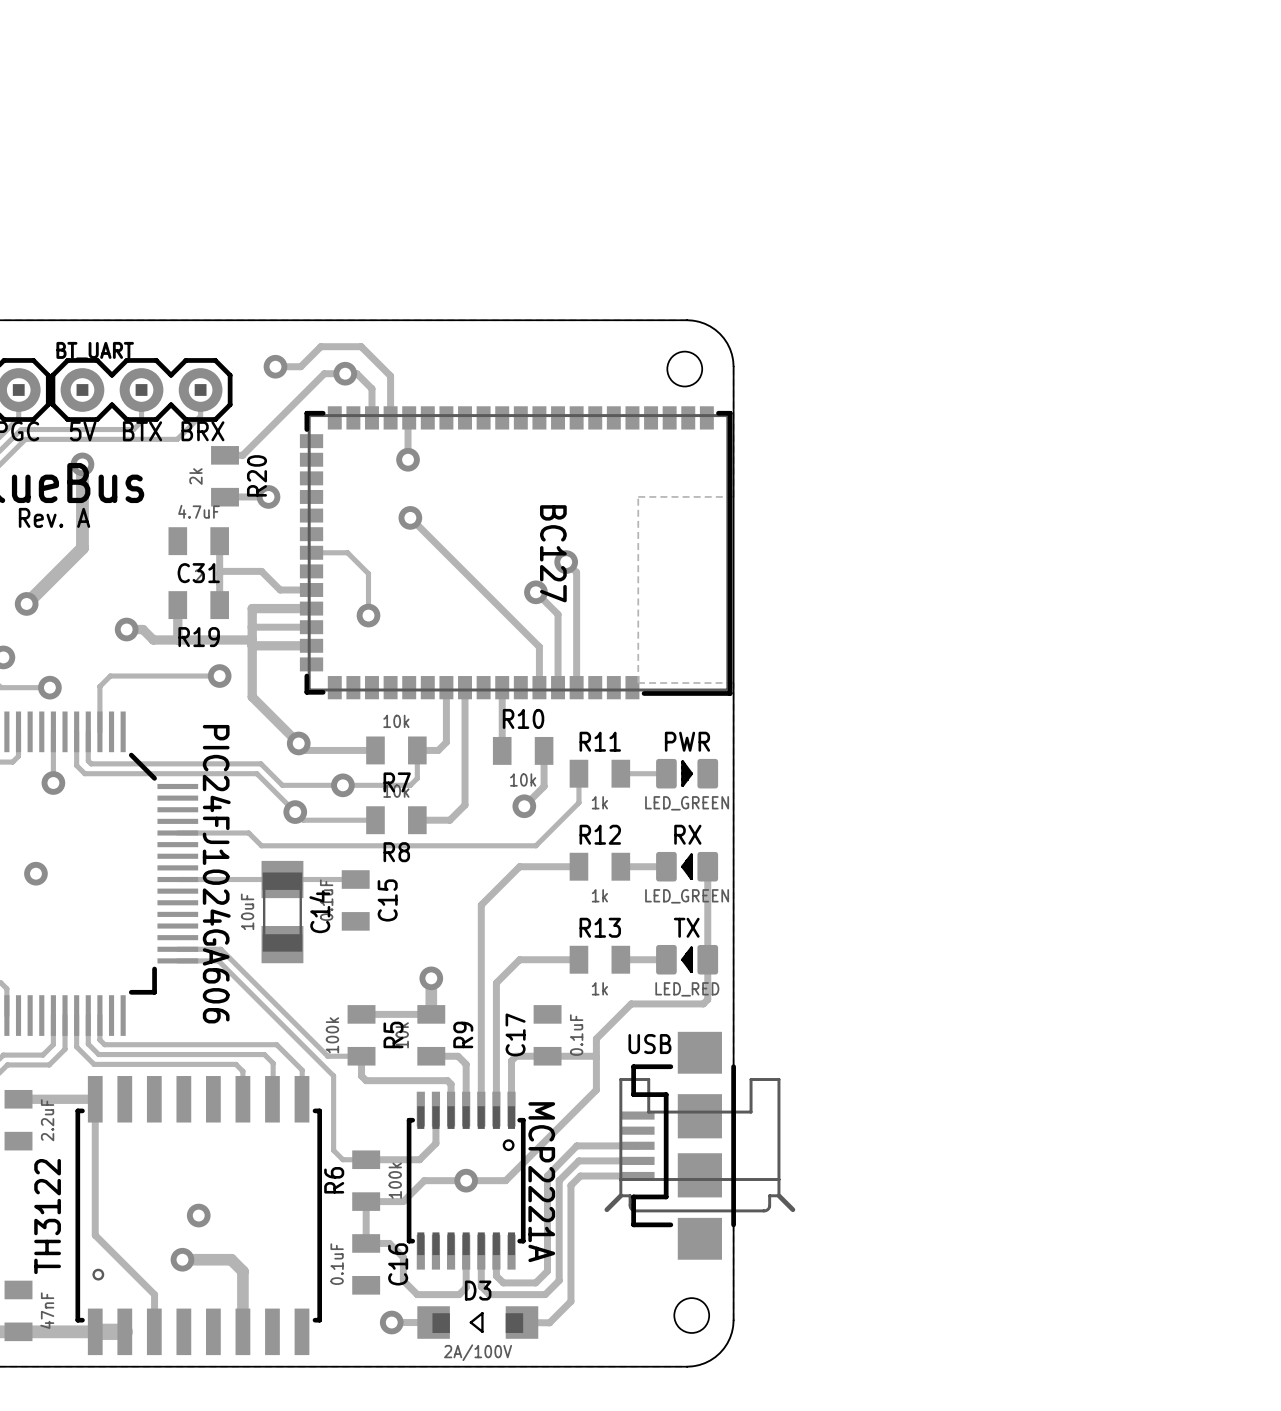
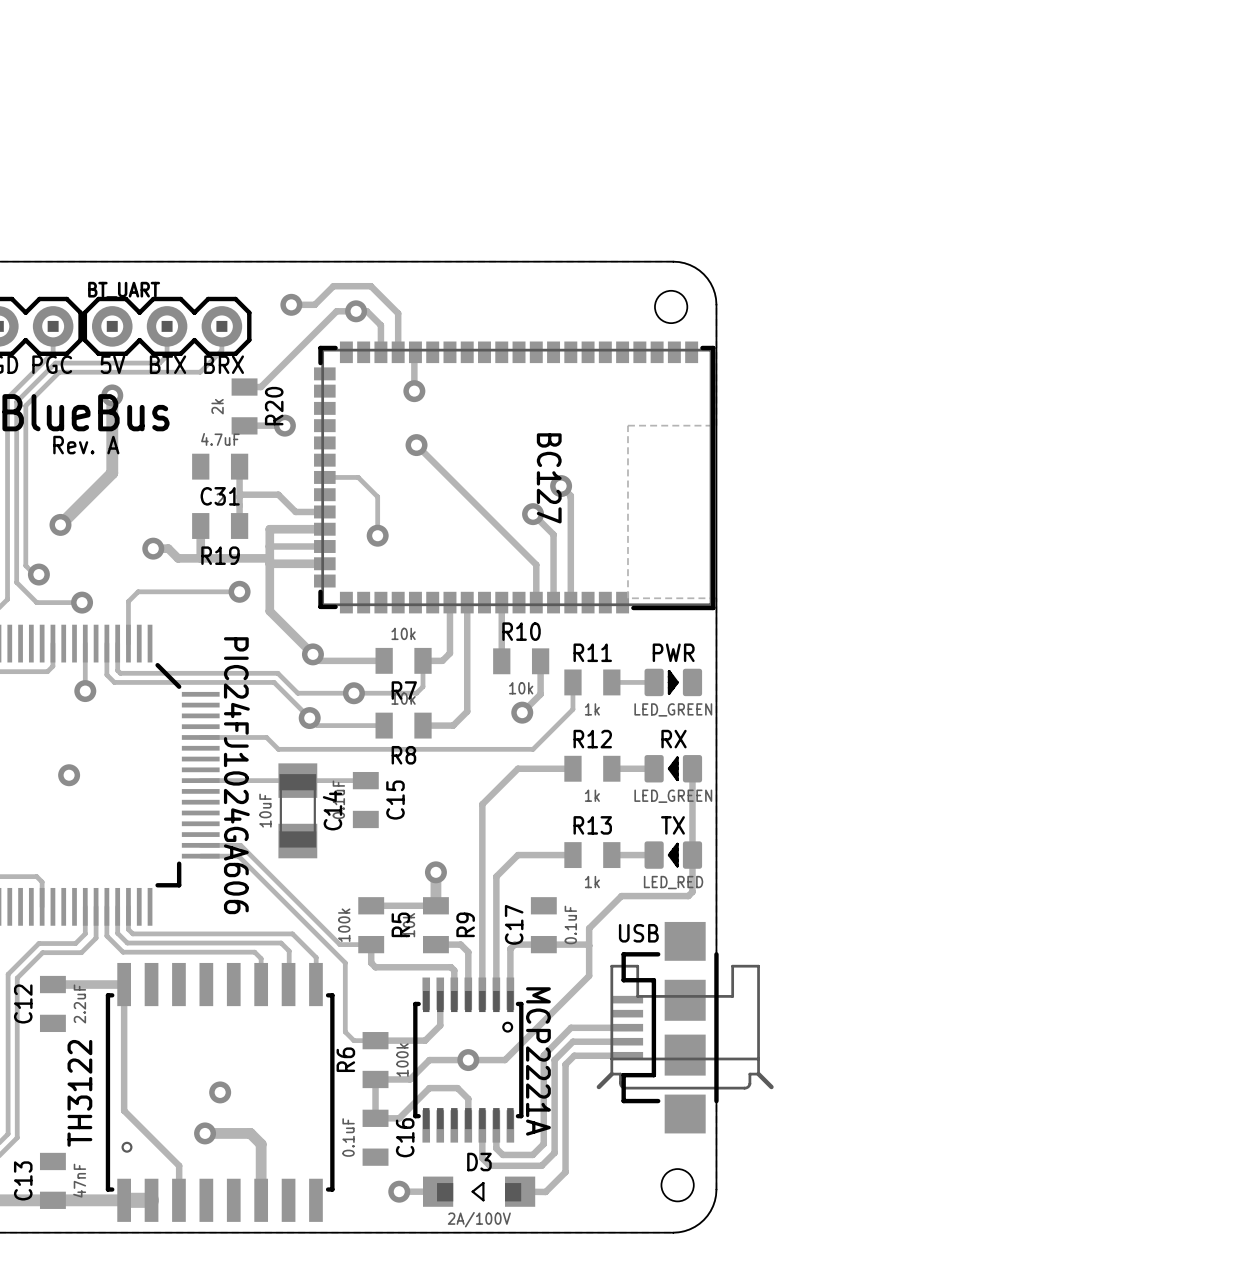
track: (389, 1243) (403, 1257) (403, 1280) (417, 1294) (459, 1294) (466, 1287) (466, 1252) -> (397, 1118) (429, 1088) (457, 1088) (468, 1098) (468, 1126)

